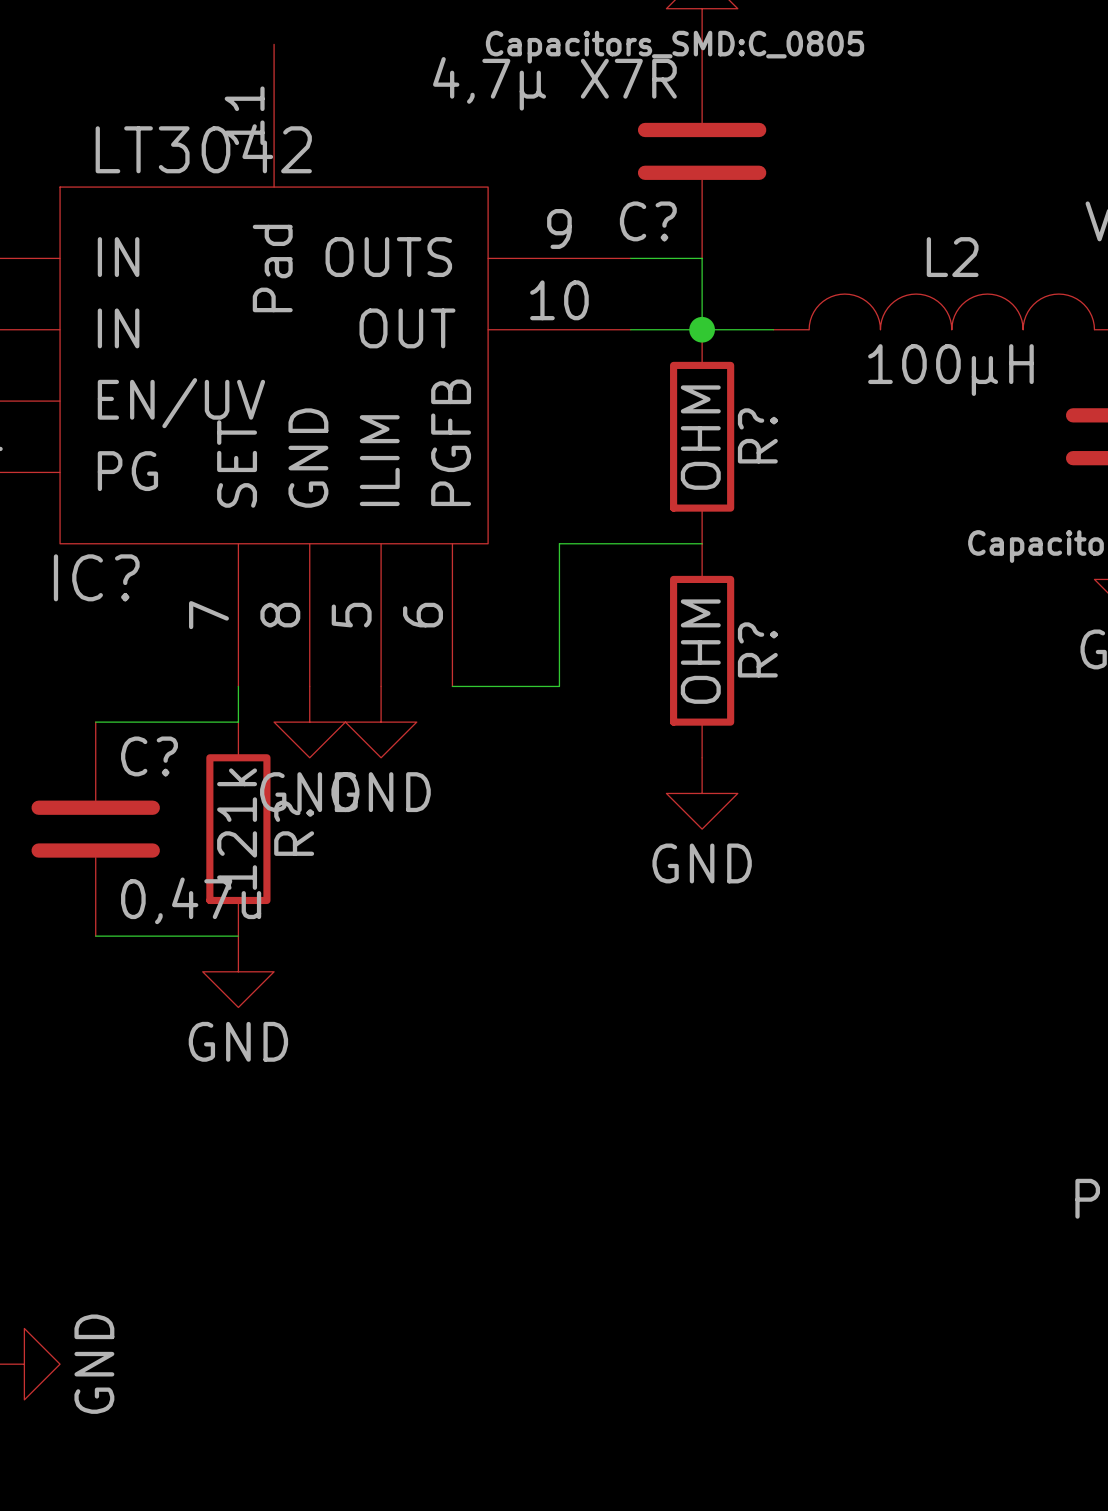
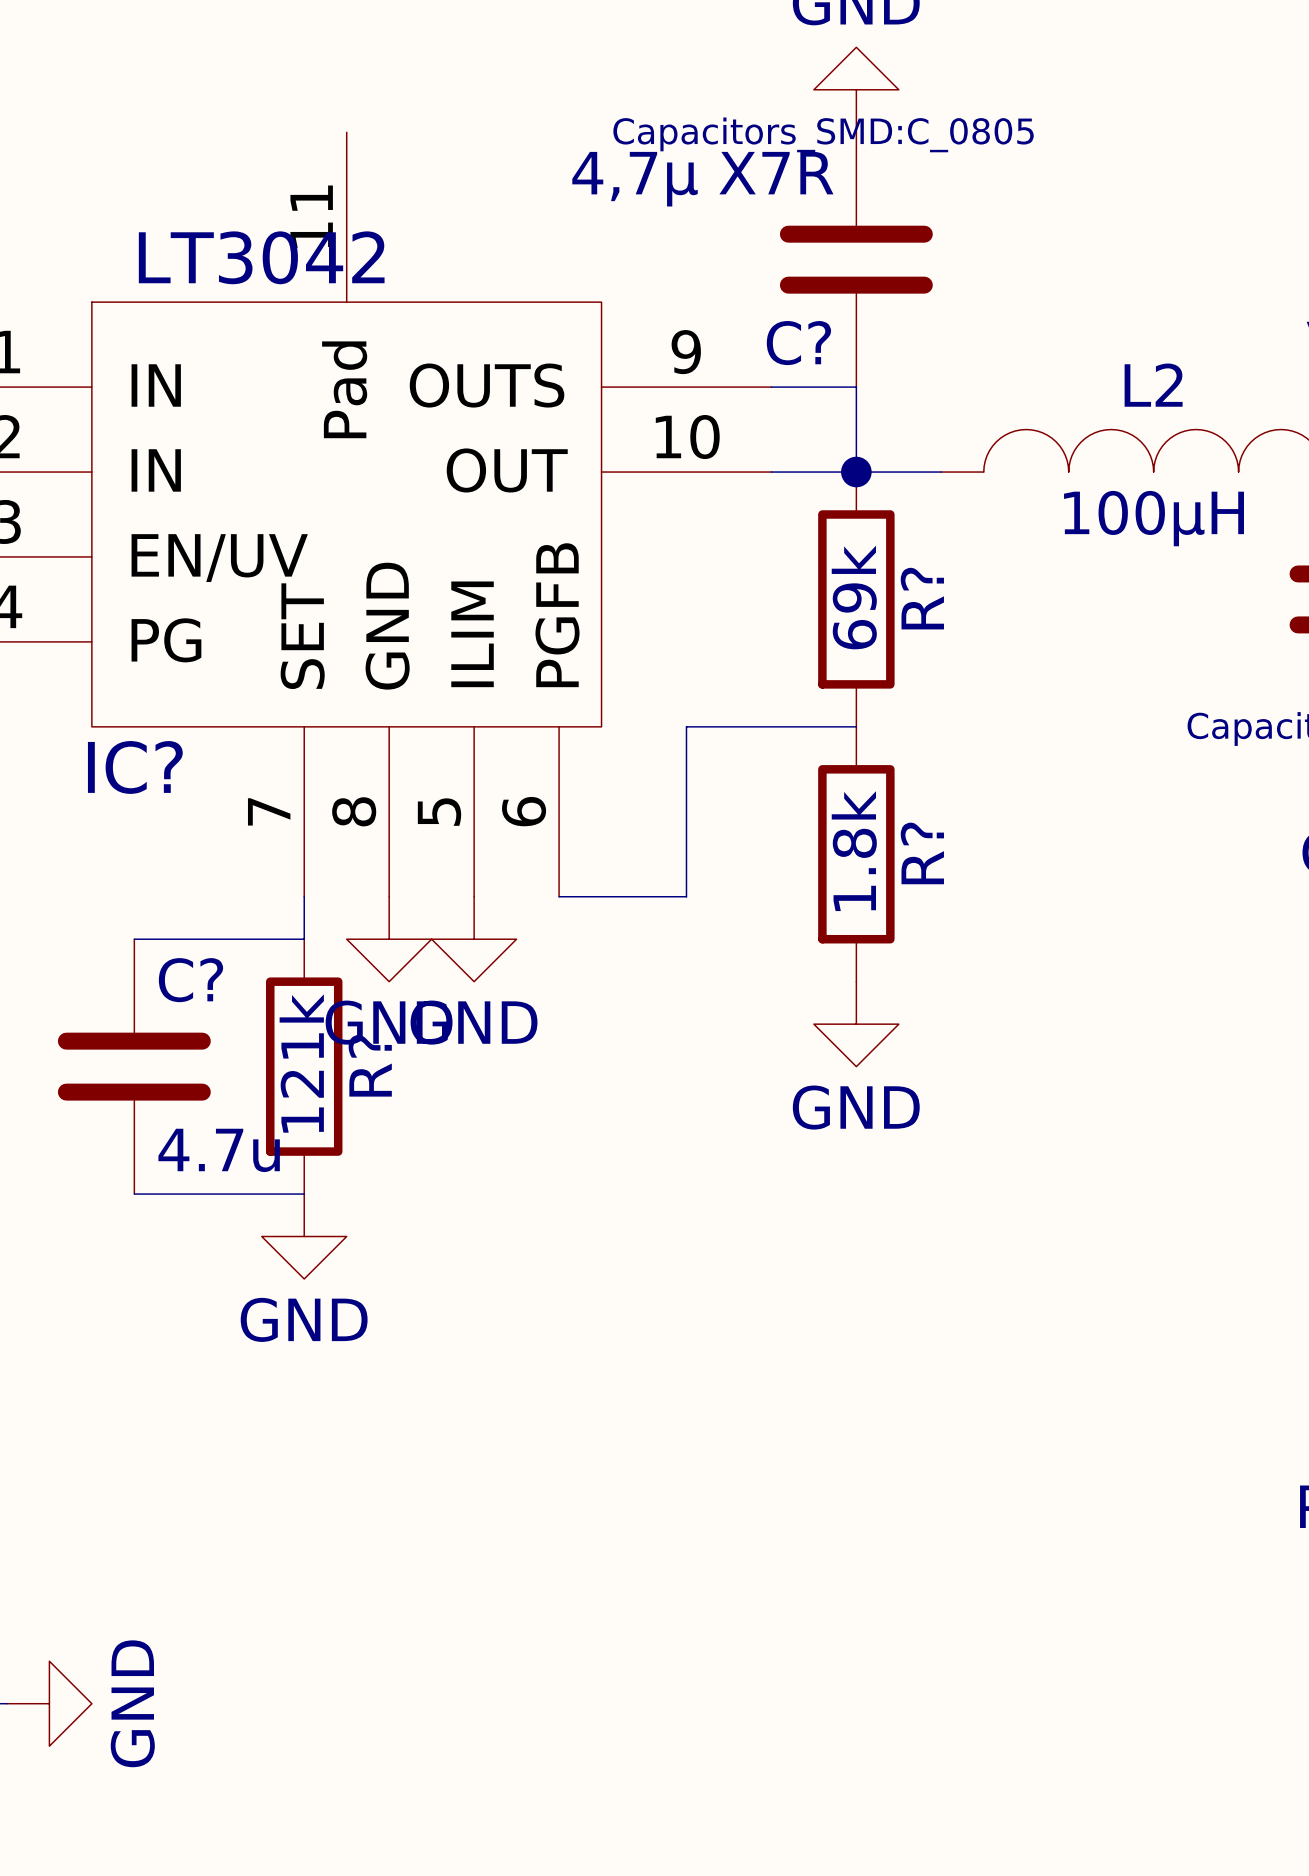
R? value: OHM (700, 437) -> 69k (854, 597)
R? value: OHM (700, 651) -> 1.8k (854, 851)
C? value: 0,47u (191, 900) -> 4.7u (219, 1150)

